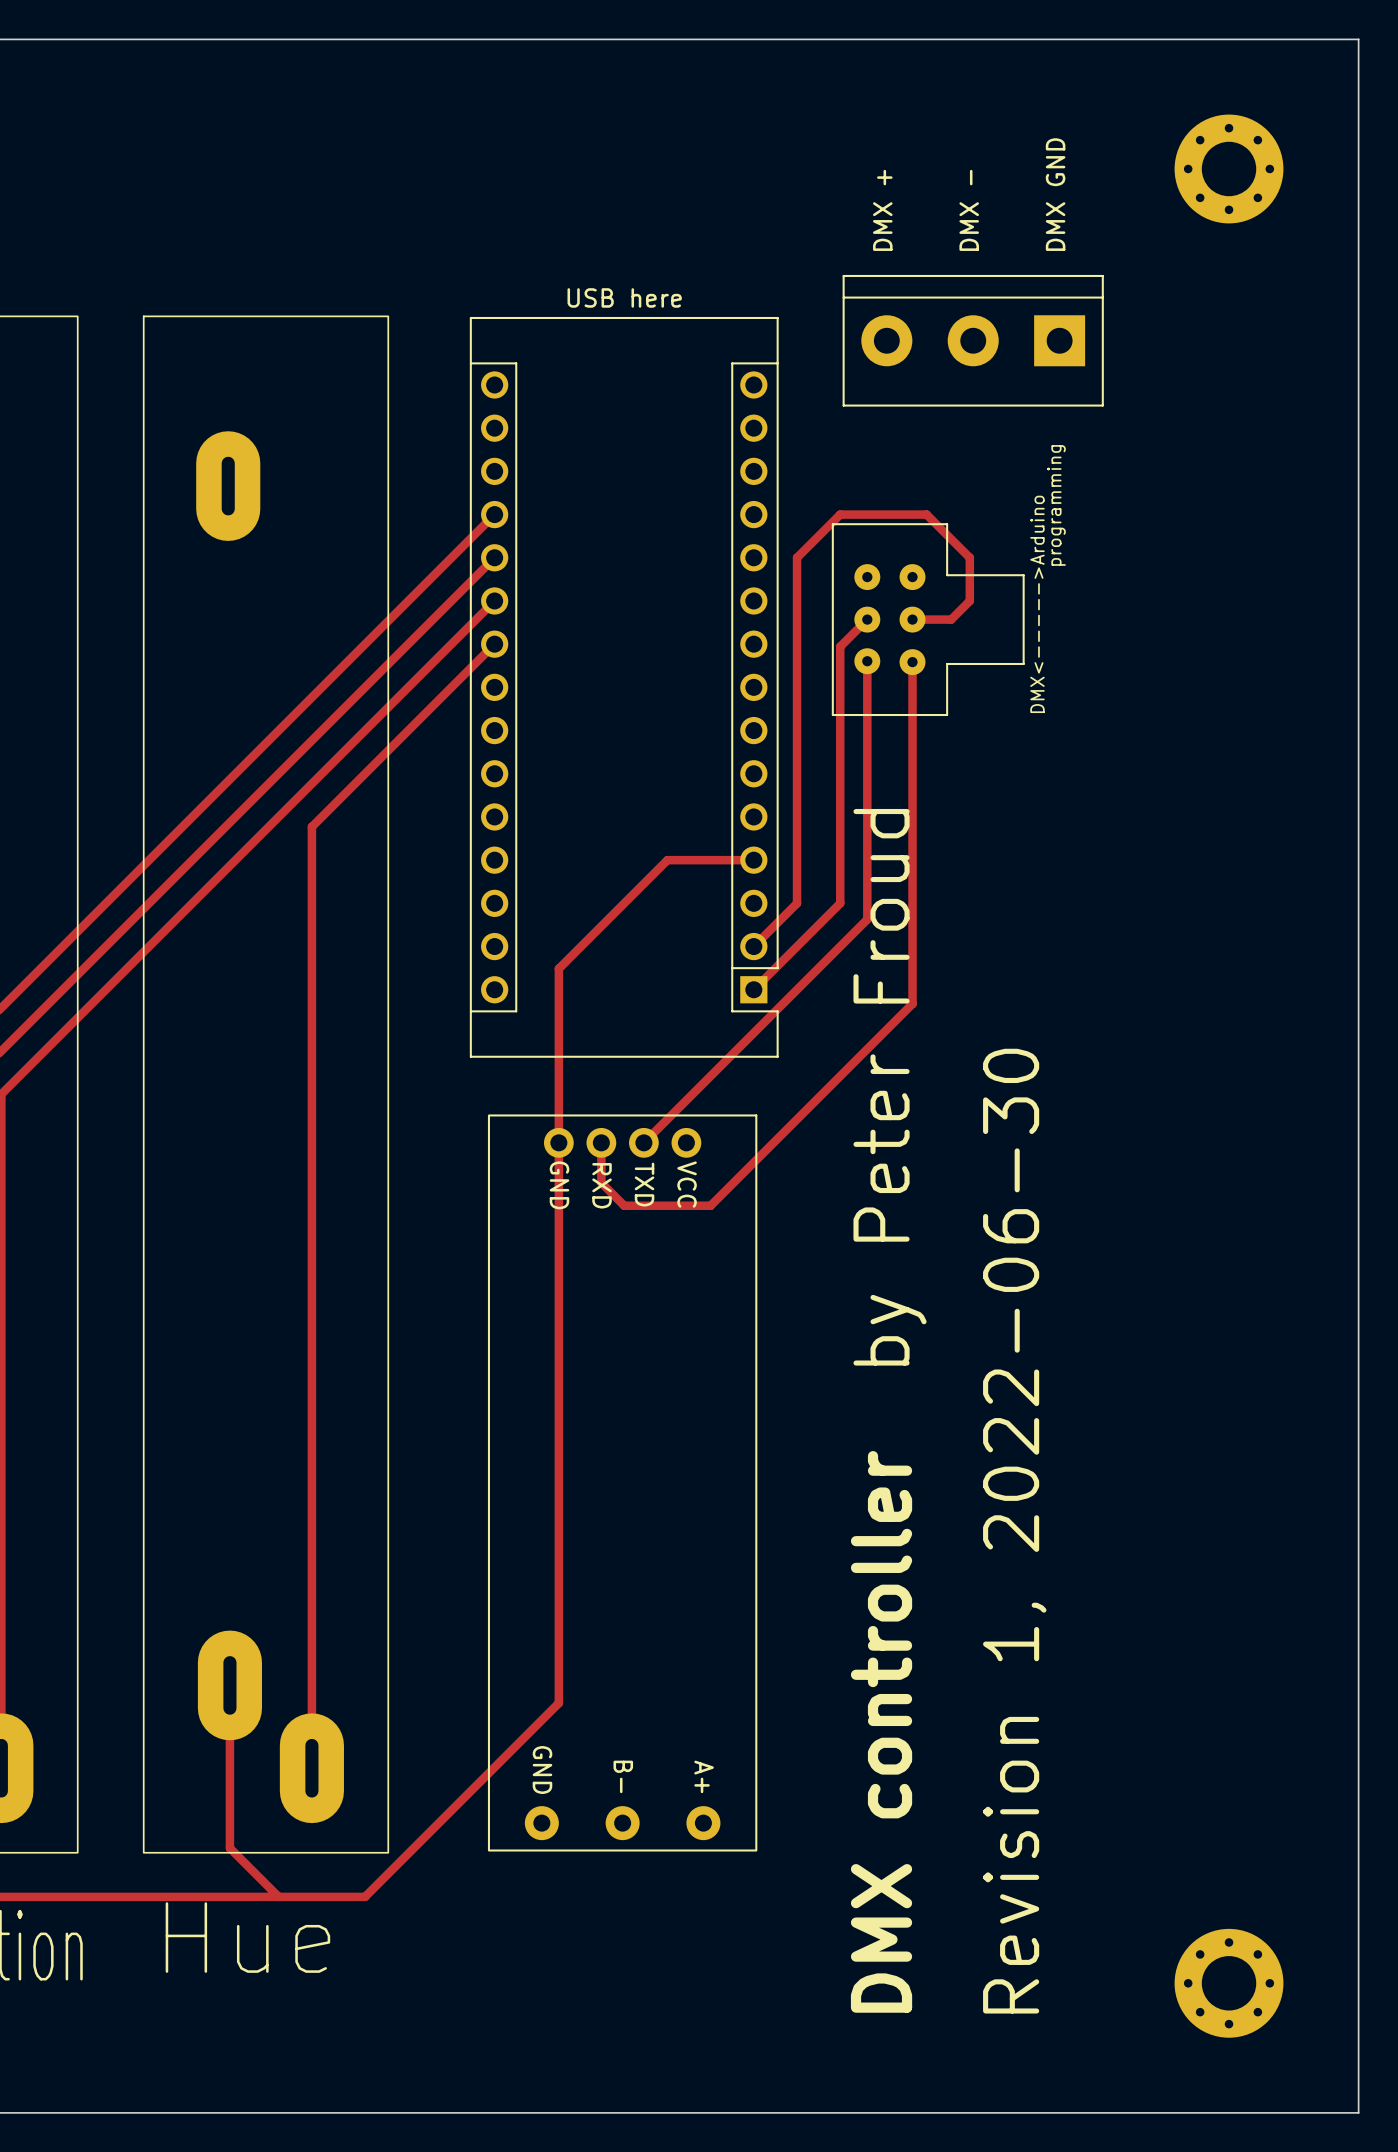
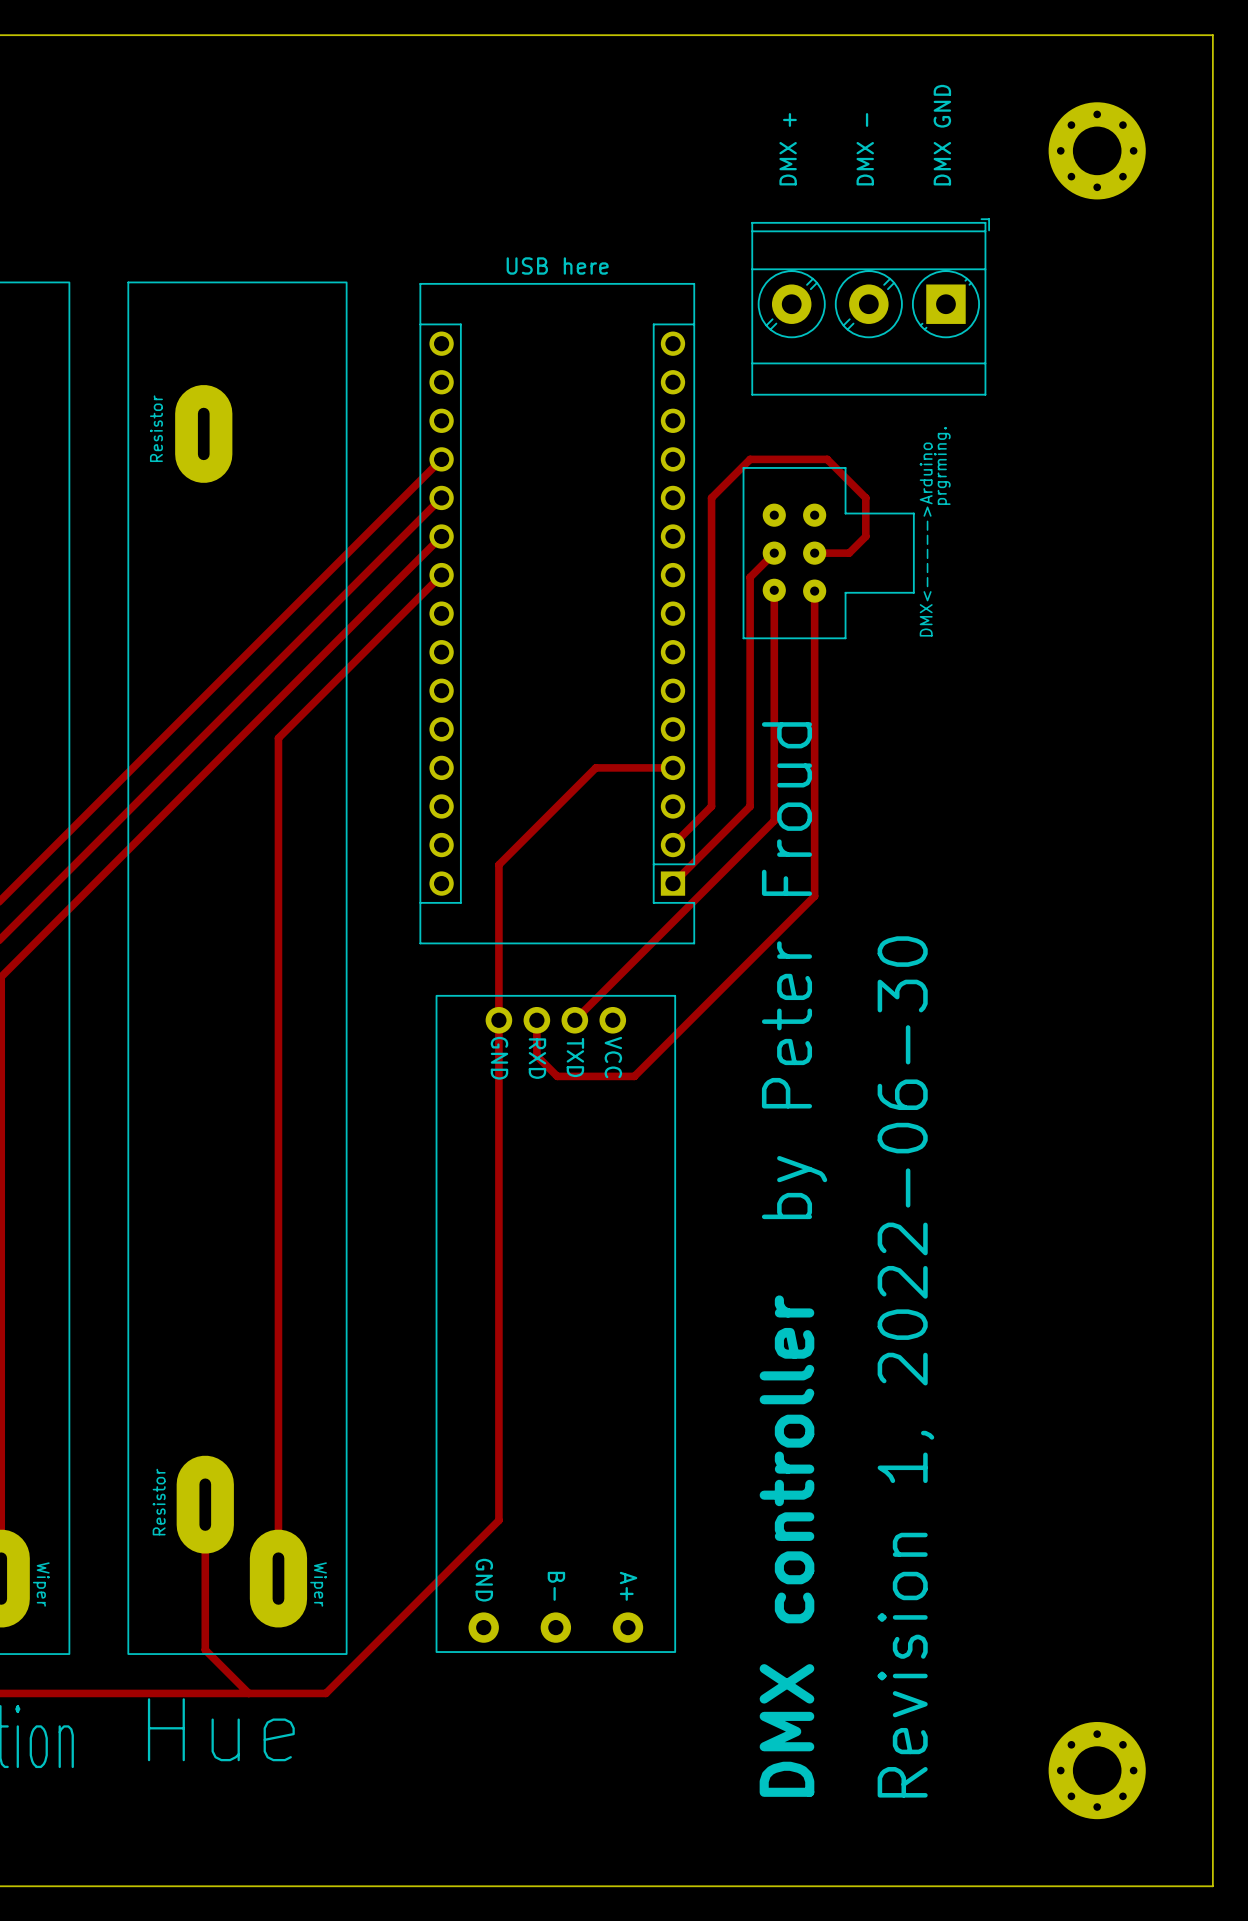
text position: DMX GND (1055, 194) -> DMX GND (942, 135)
text position: DMX + (882, 210) -> DMX + (788, 149)
text position: DMX - (969, 210) -> DMX - (865, 149)
part footprint: [842, 274, 1104, 407] -> [751, 218, 991, 396]
part text: none -> Resistor (156, 428)
text: programming (1056, 505) -> prgrming. (942, 465)
part text: none -> Resistor (159, 1502)
part text: none -> Wiper (41, 1584)
part text: none -> Wiper (318, 1584)

